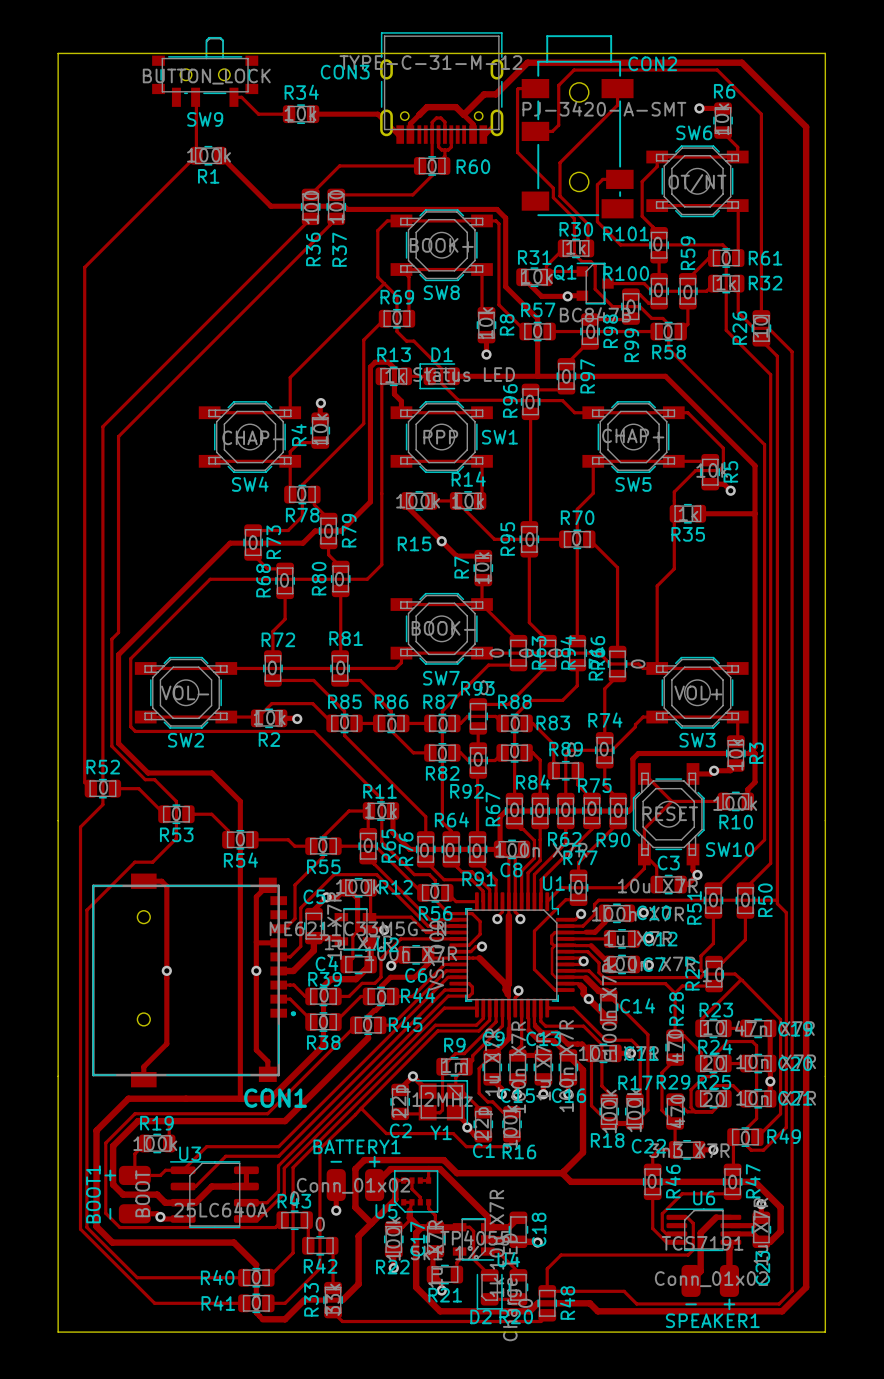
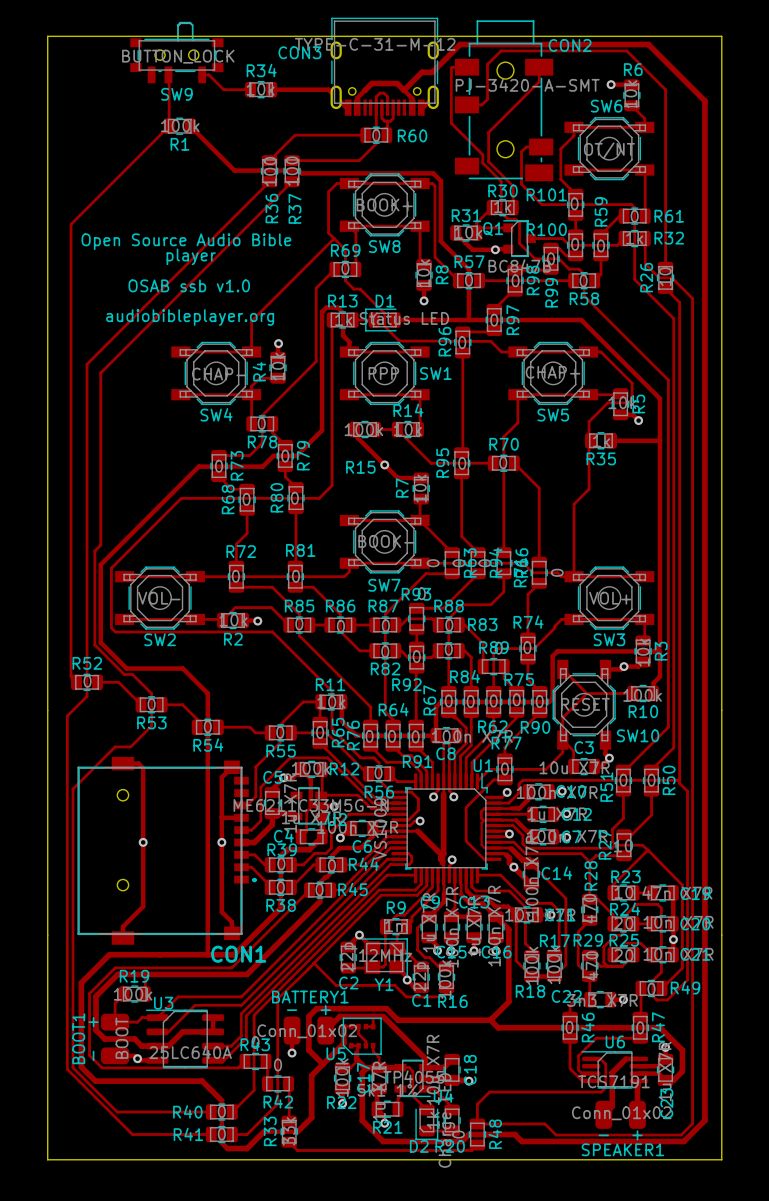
text: none -> Open Source Audio Bible (186, 241)
text: none -> player (191, 256)
text: none -> OSAB ssb v1.0 (189, 285)
text: none -> audiobibleplayer.org (190, 317)

